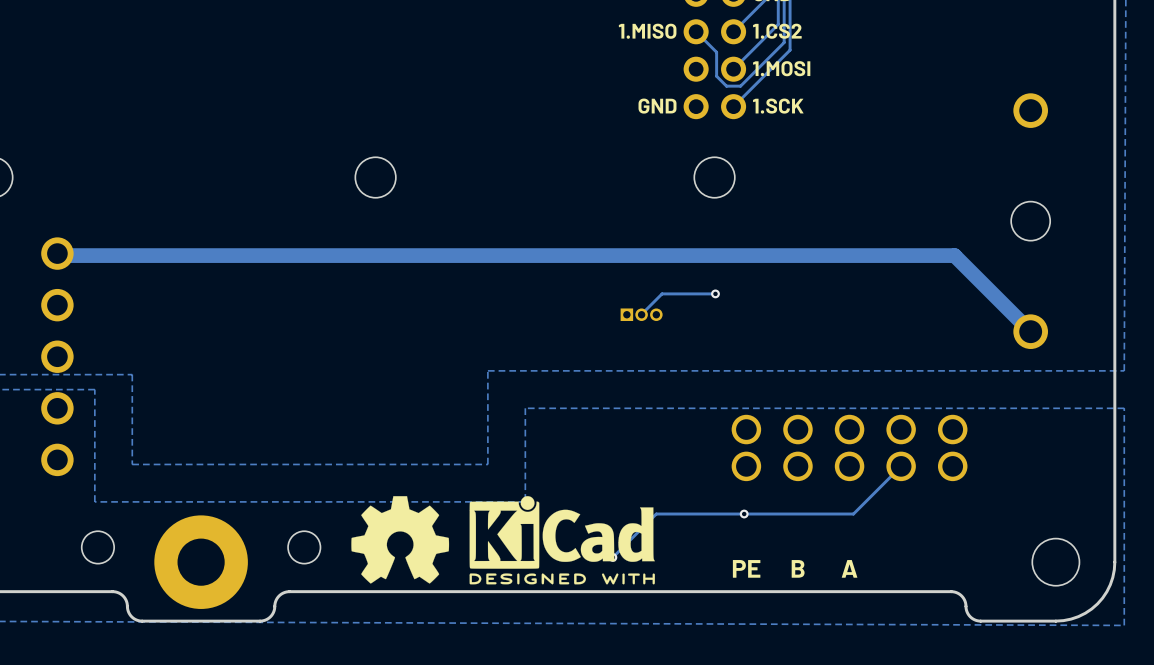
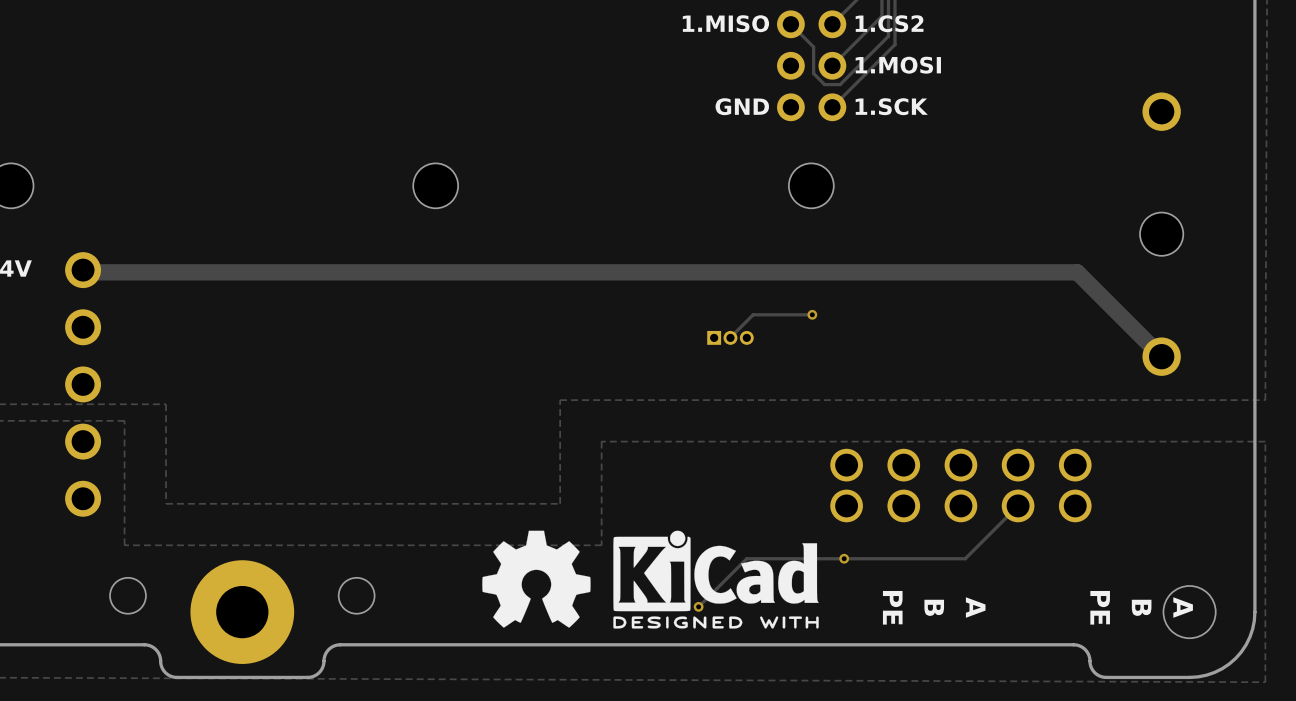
drawing position: (400, 539) -> (536, 579)
drawing position: (562, 540) -> (716, 579)
text: none -> PE (1100, 607)
text: none -> B (1141, 607)
text: none -> A (1183, 607)
text rotation: 0° (746, 568) -> 90° clockwise (892, 607)
text rotation: 0° (798, 568) -> 90° clockwise (934, 607)
text rotation: 0° (849, 568) -> 90° clockwise (975, 607)

